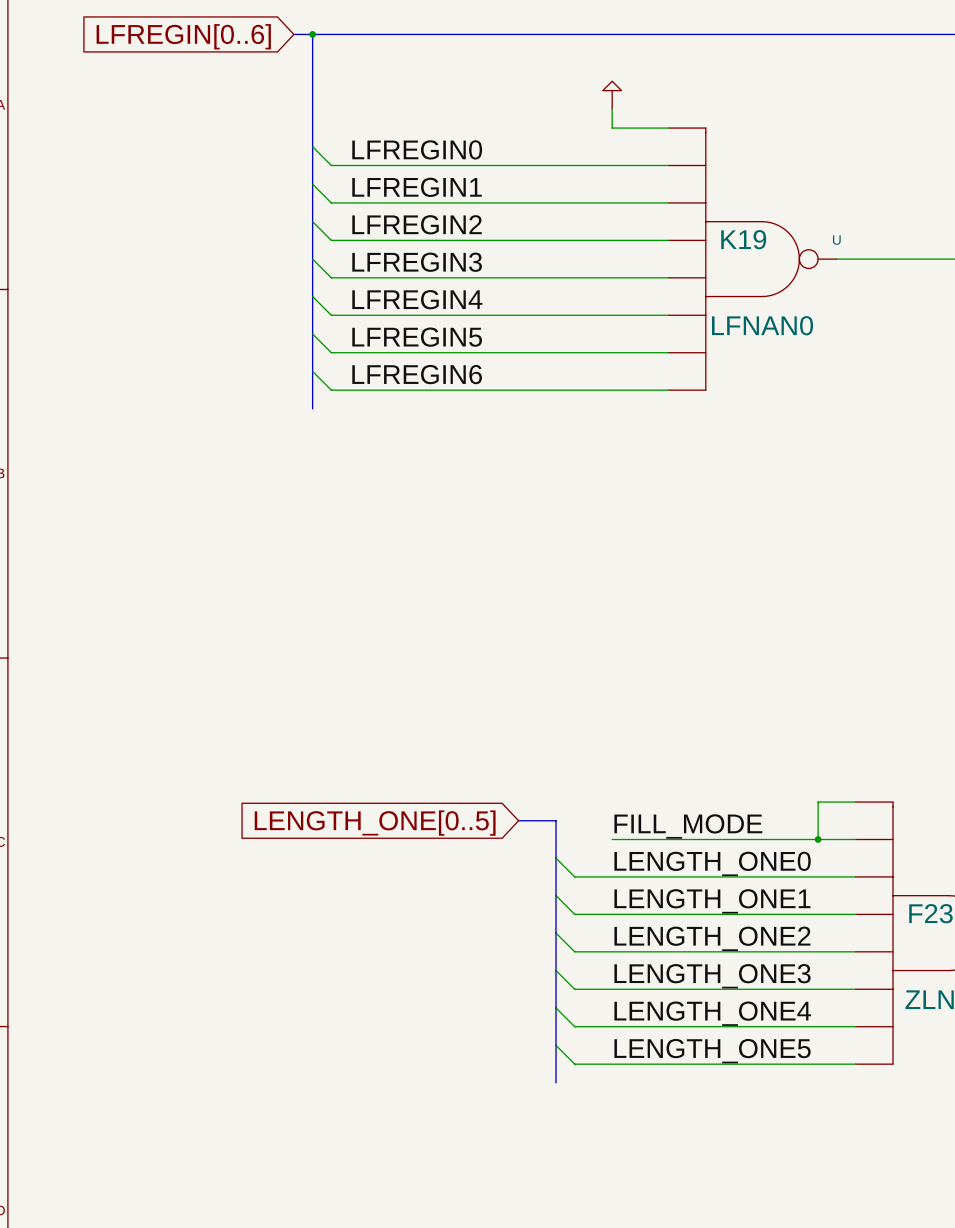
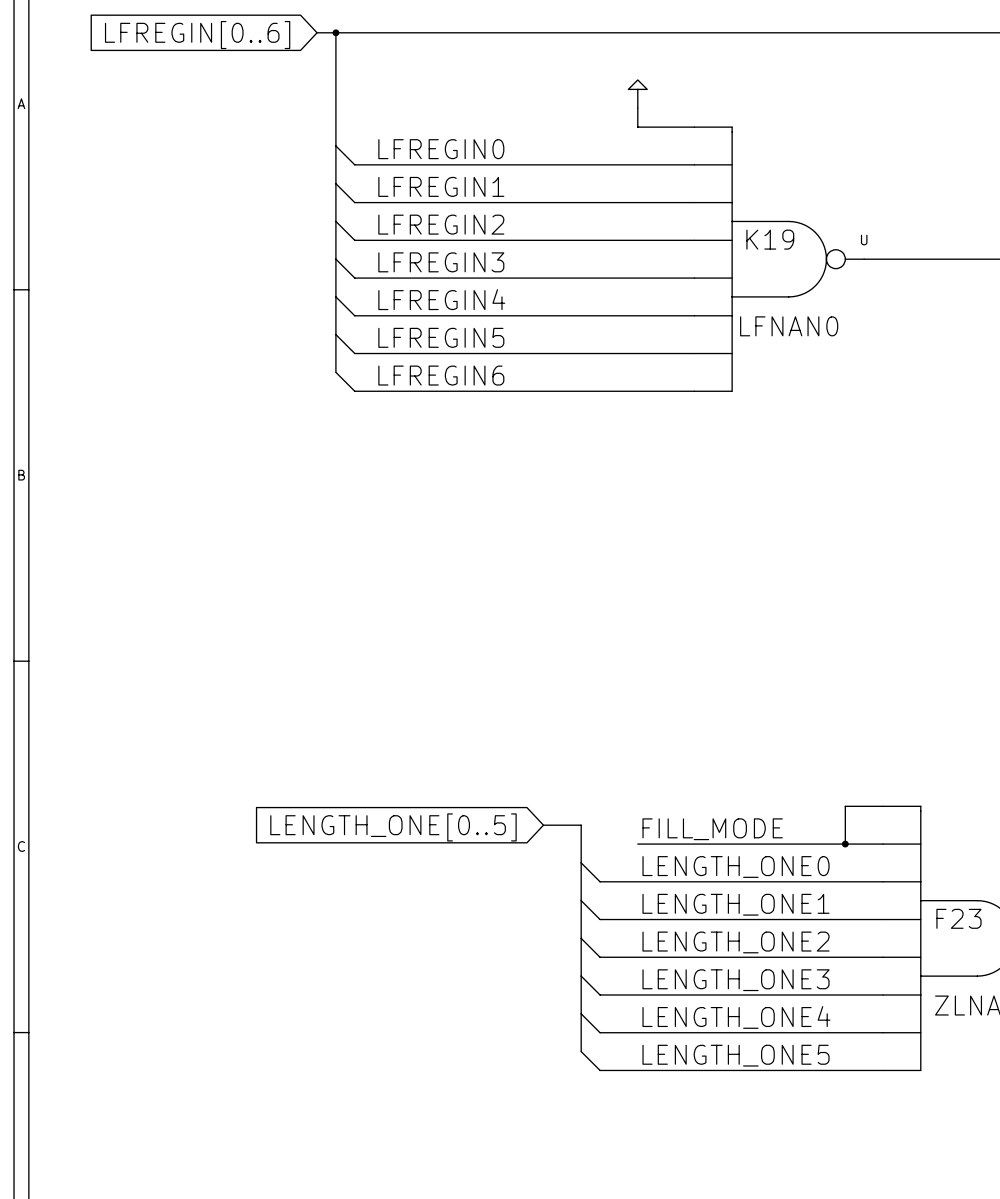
bus: (312, 371) (312, 408) -> none
bus: (556, 1045) (556, 1082) -> none

